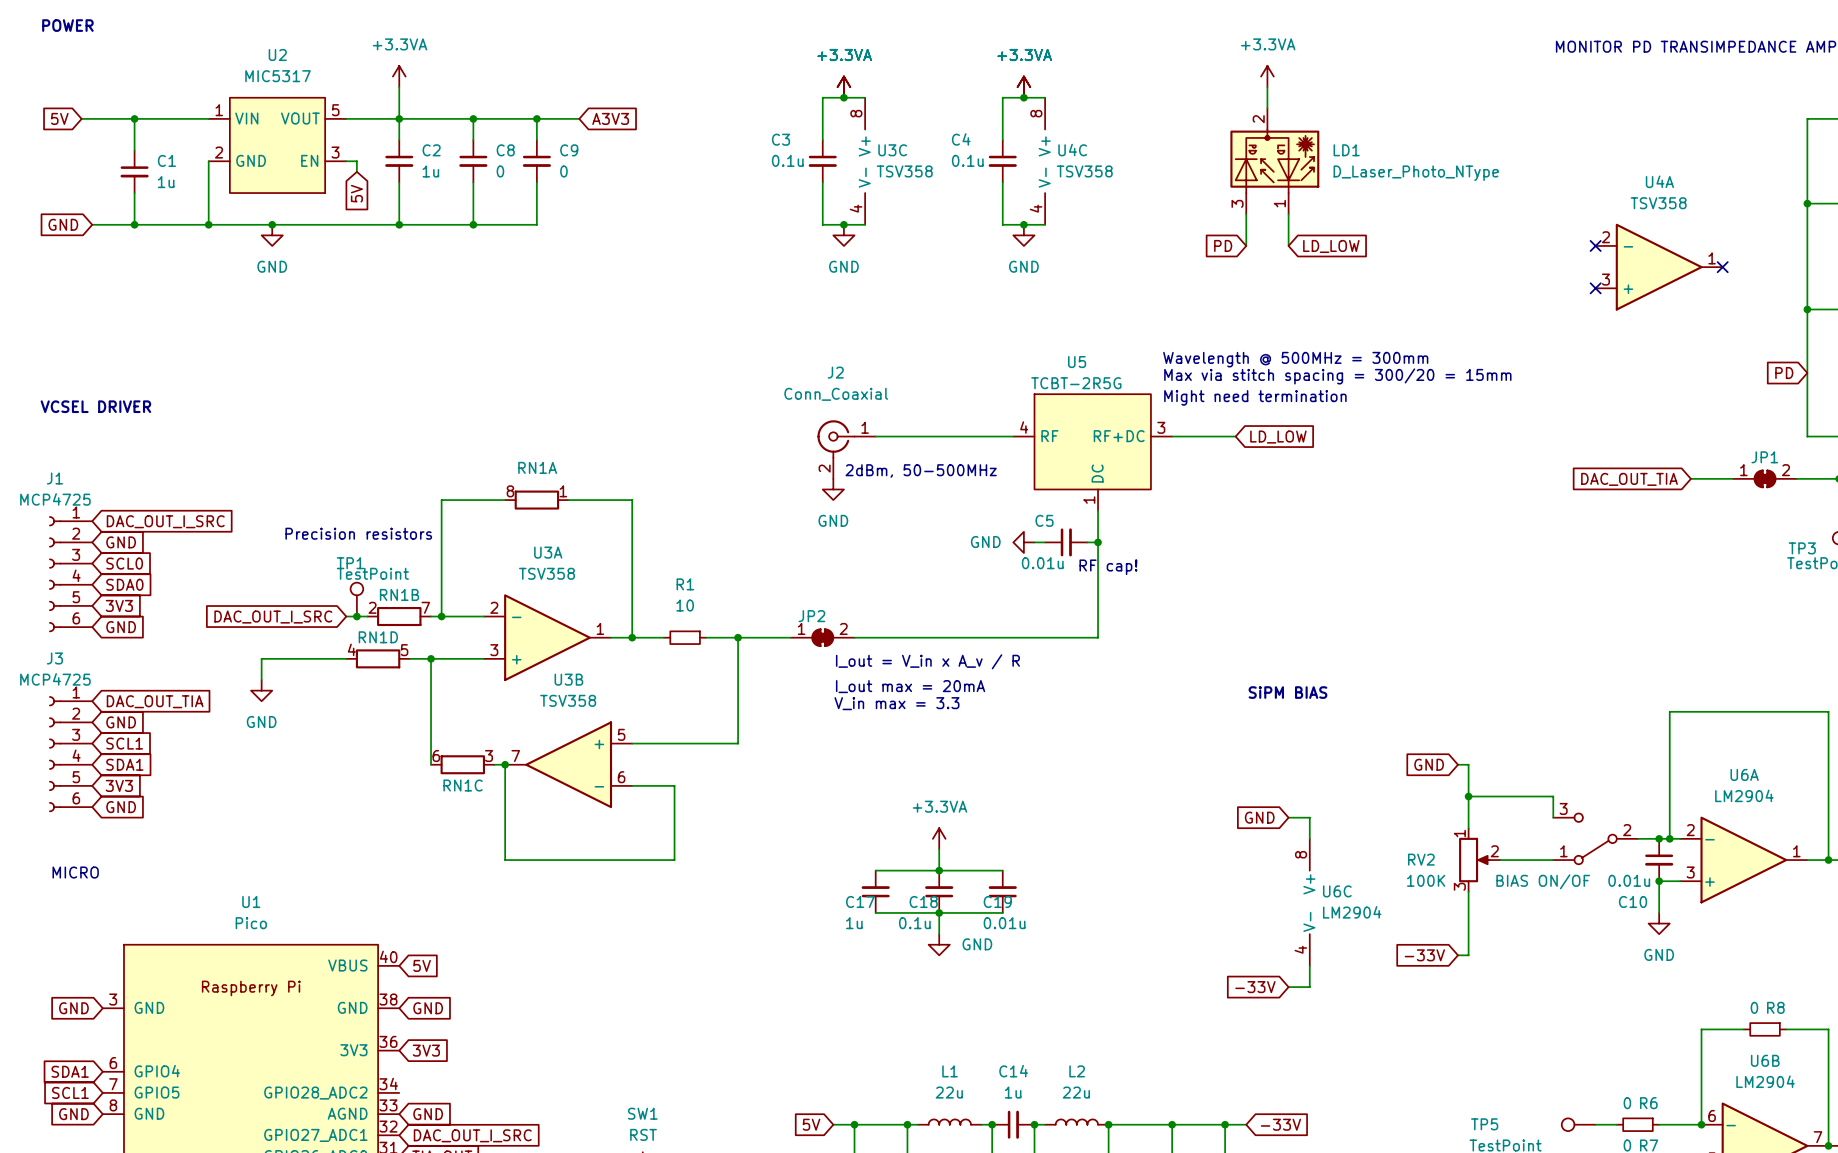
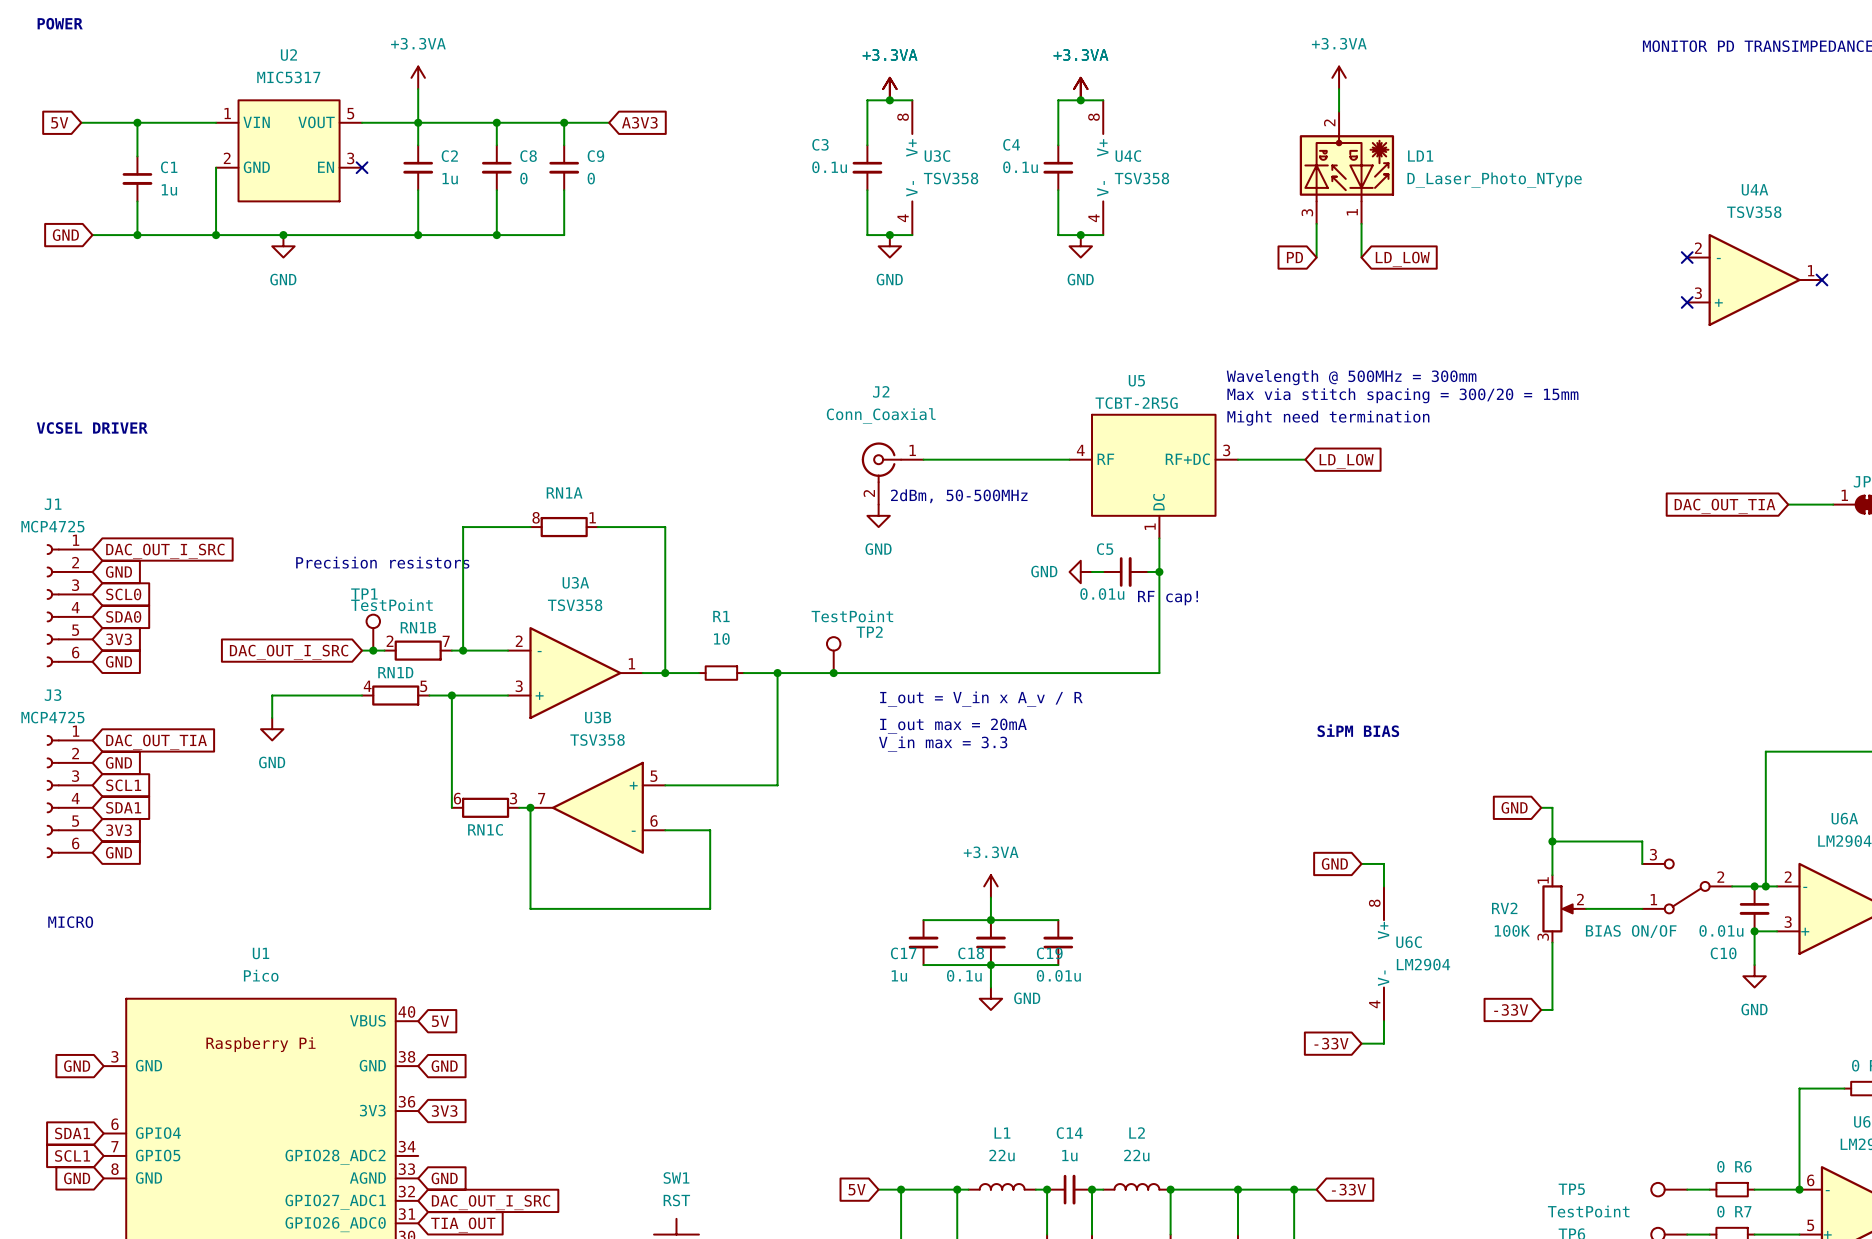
wire: (346, 161) (356, 161) (356, 171) -> none
no-connect mark: none -> (362, 167)
global label: 5V (356, 193) -> none
TP2: none -> TestPoint (833, 655)
junction: none -> (833, 673)
JP2: (822, 637) -> none

